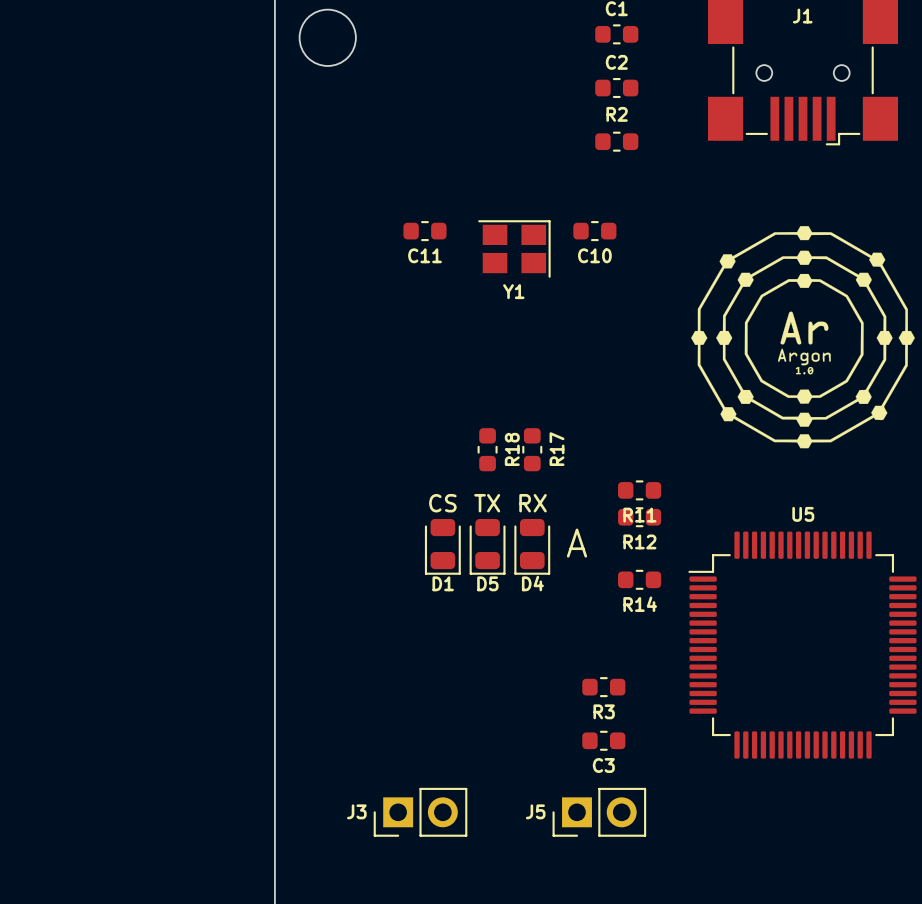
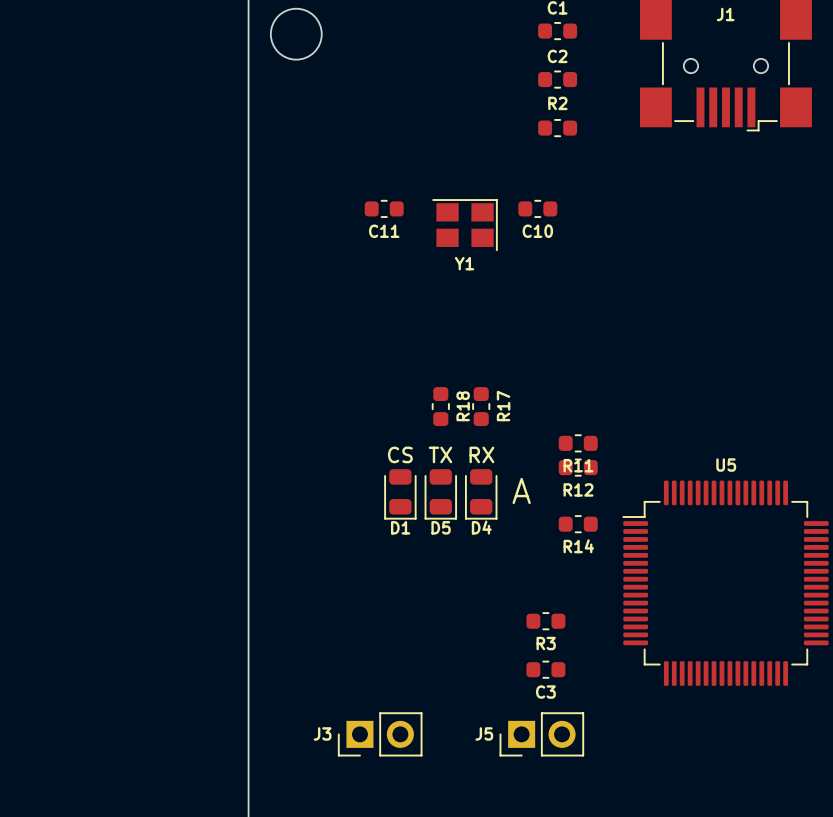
drawing: [691, 226, 915, 449] -> none

